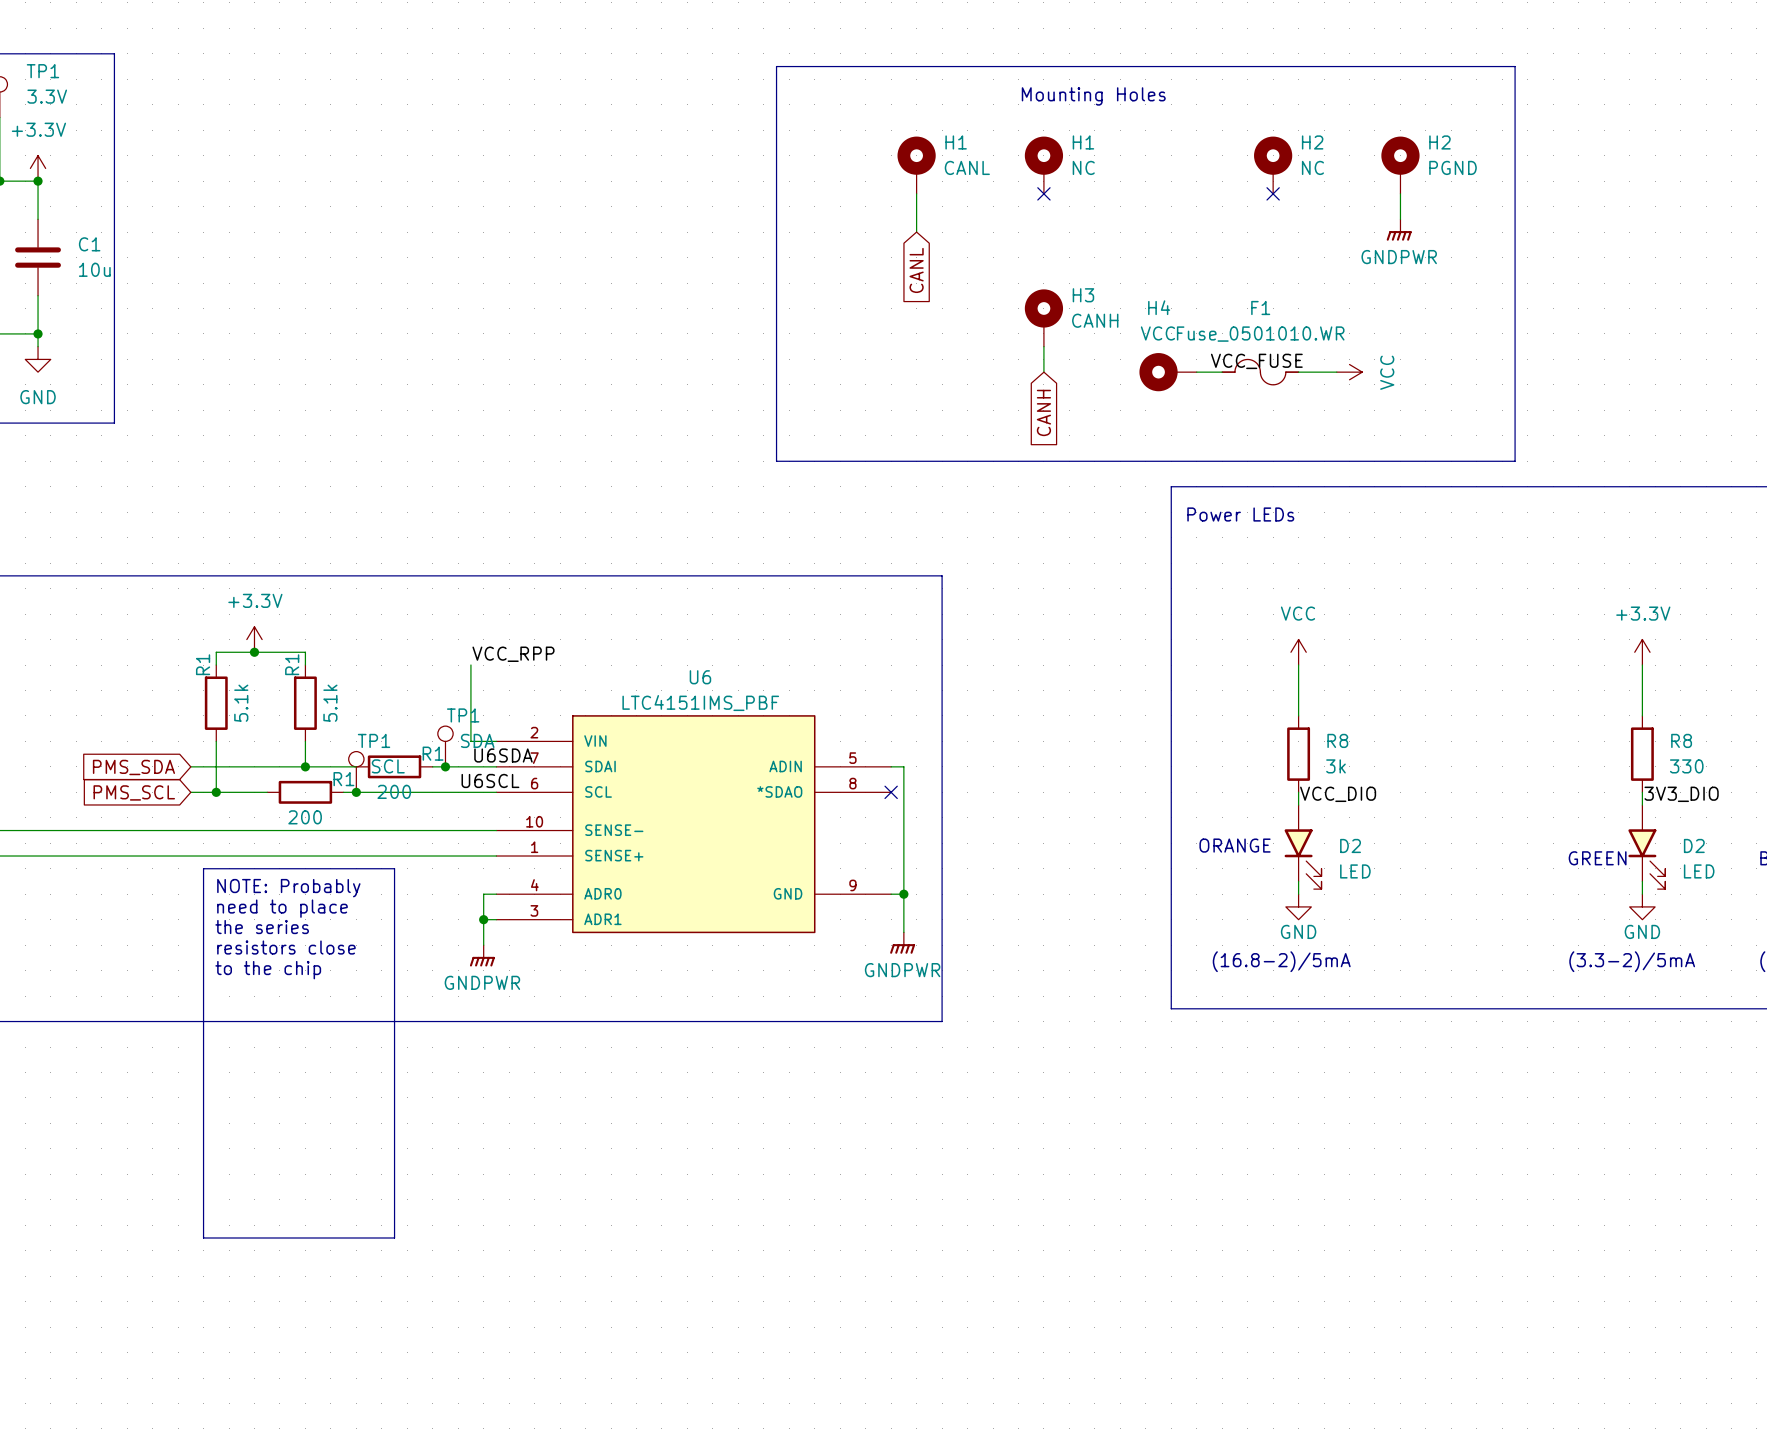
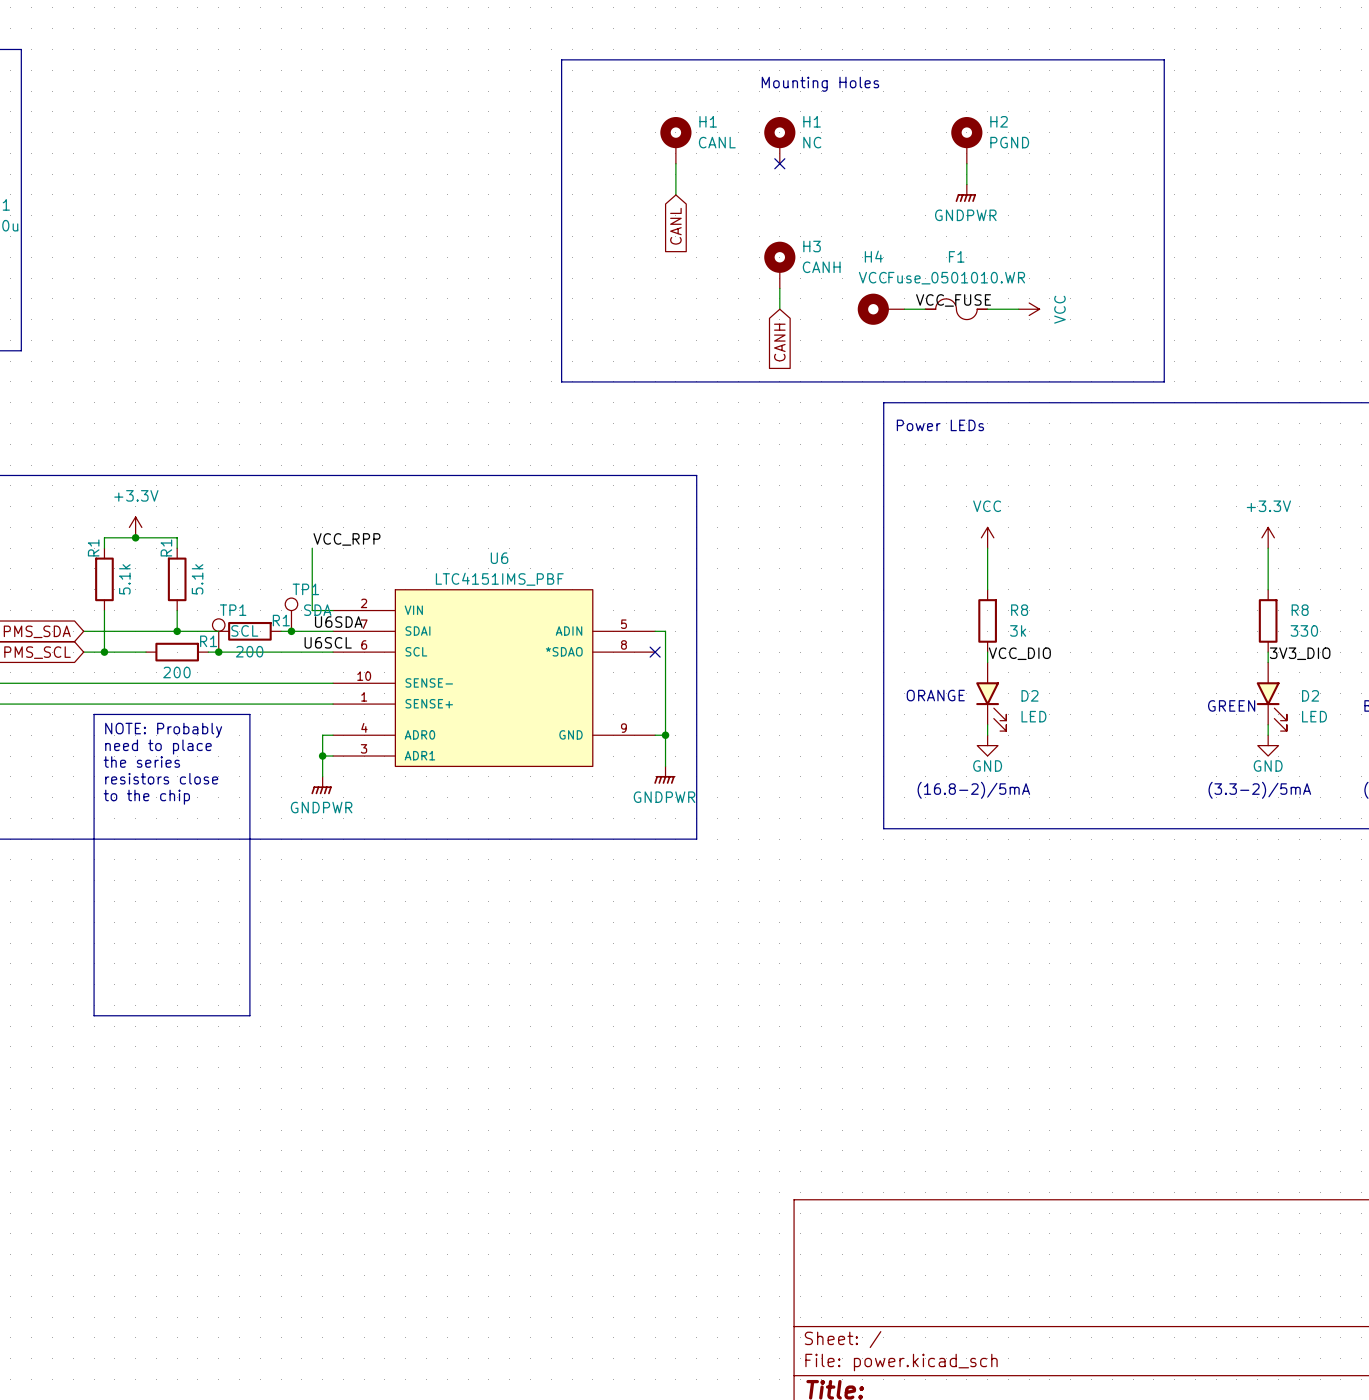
H2: PGND (1400, 165) -> none
H2 value: NC (1312, 167) -> PGND (1009, 142)
no-connect mark: (1273, 193) -> none
wire: (1400, 193) (1400, 219) -> (966, 163) (966, 184)
power symbol position: GNDPWR (1399, 230) -> GNDPWR (965, 193)

